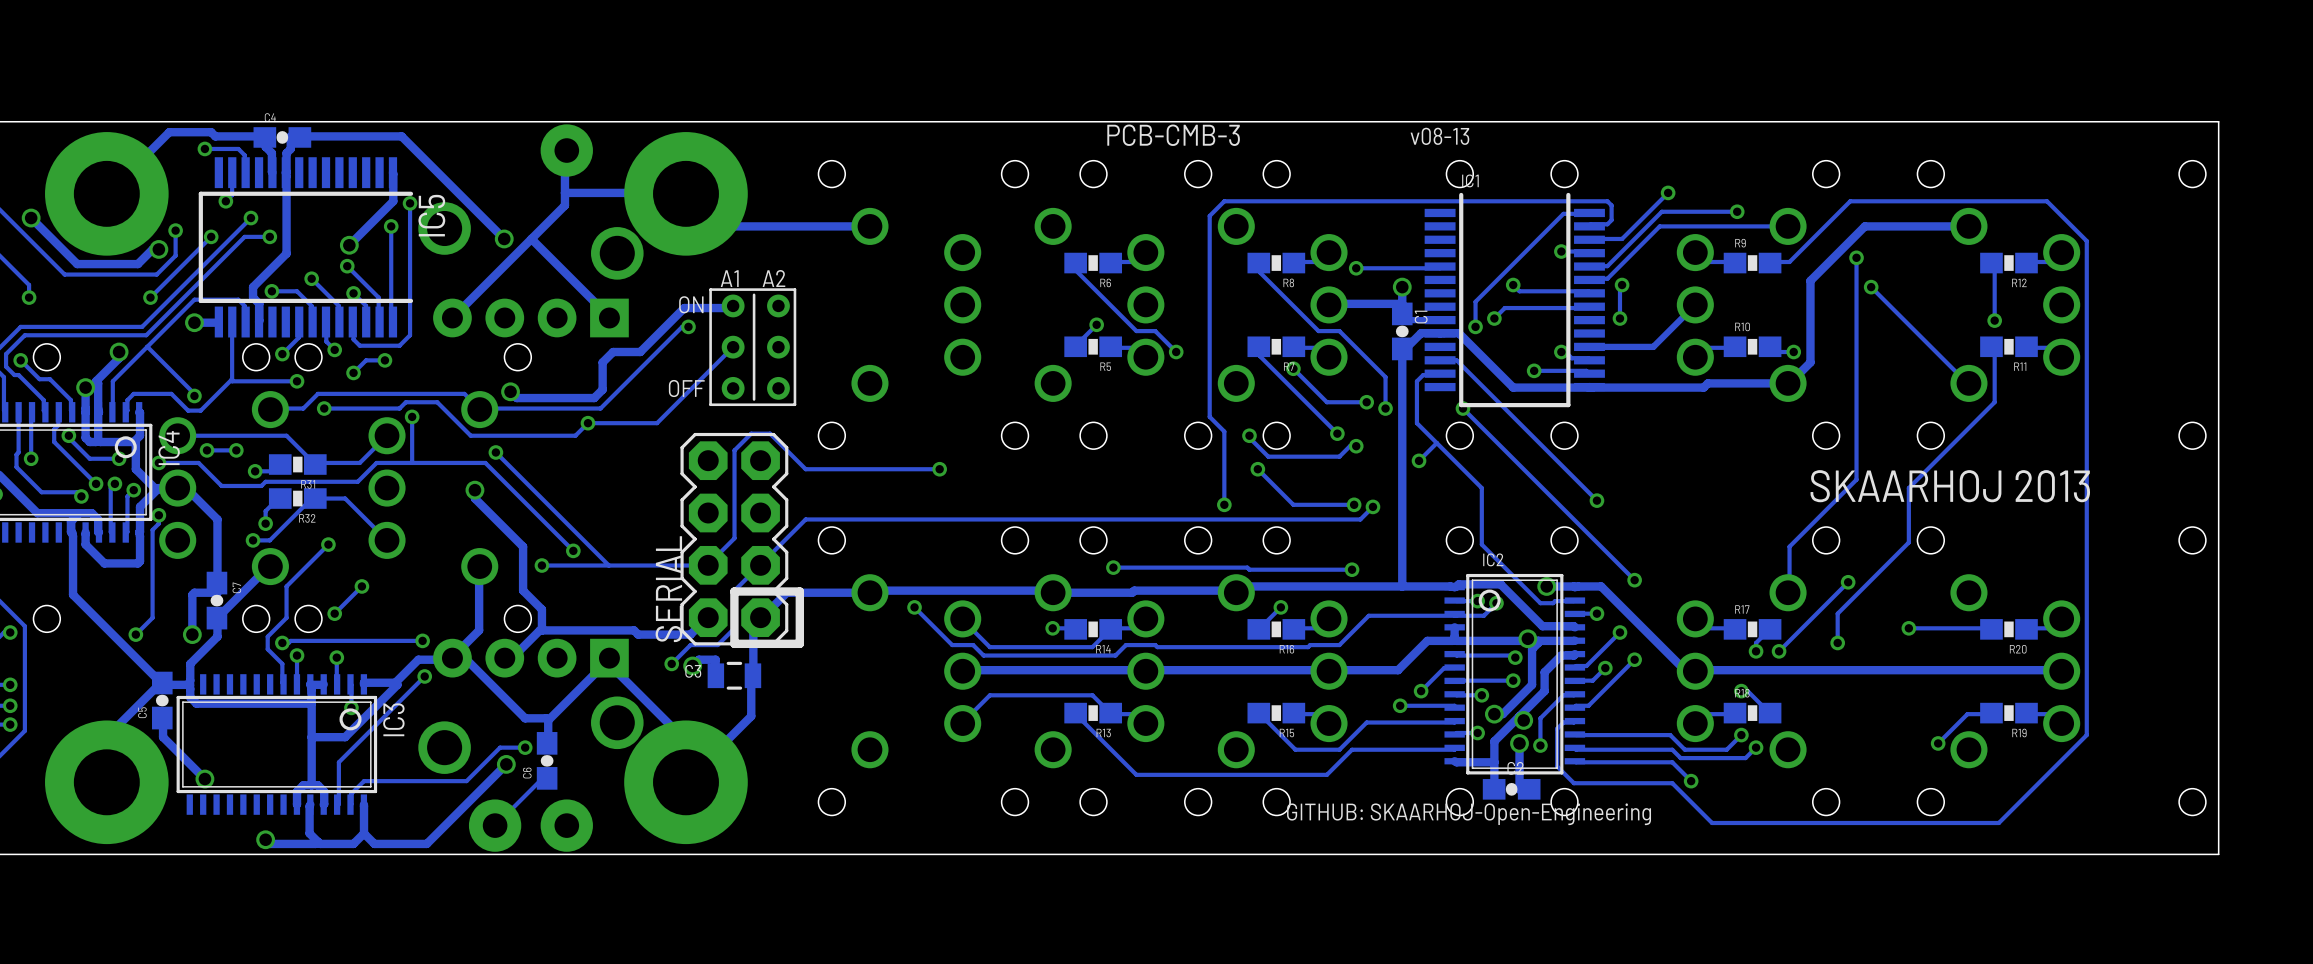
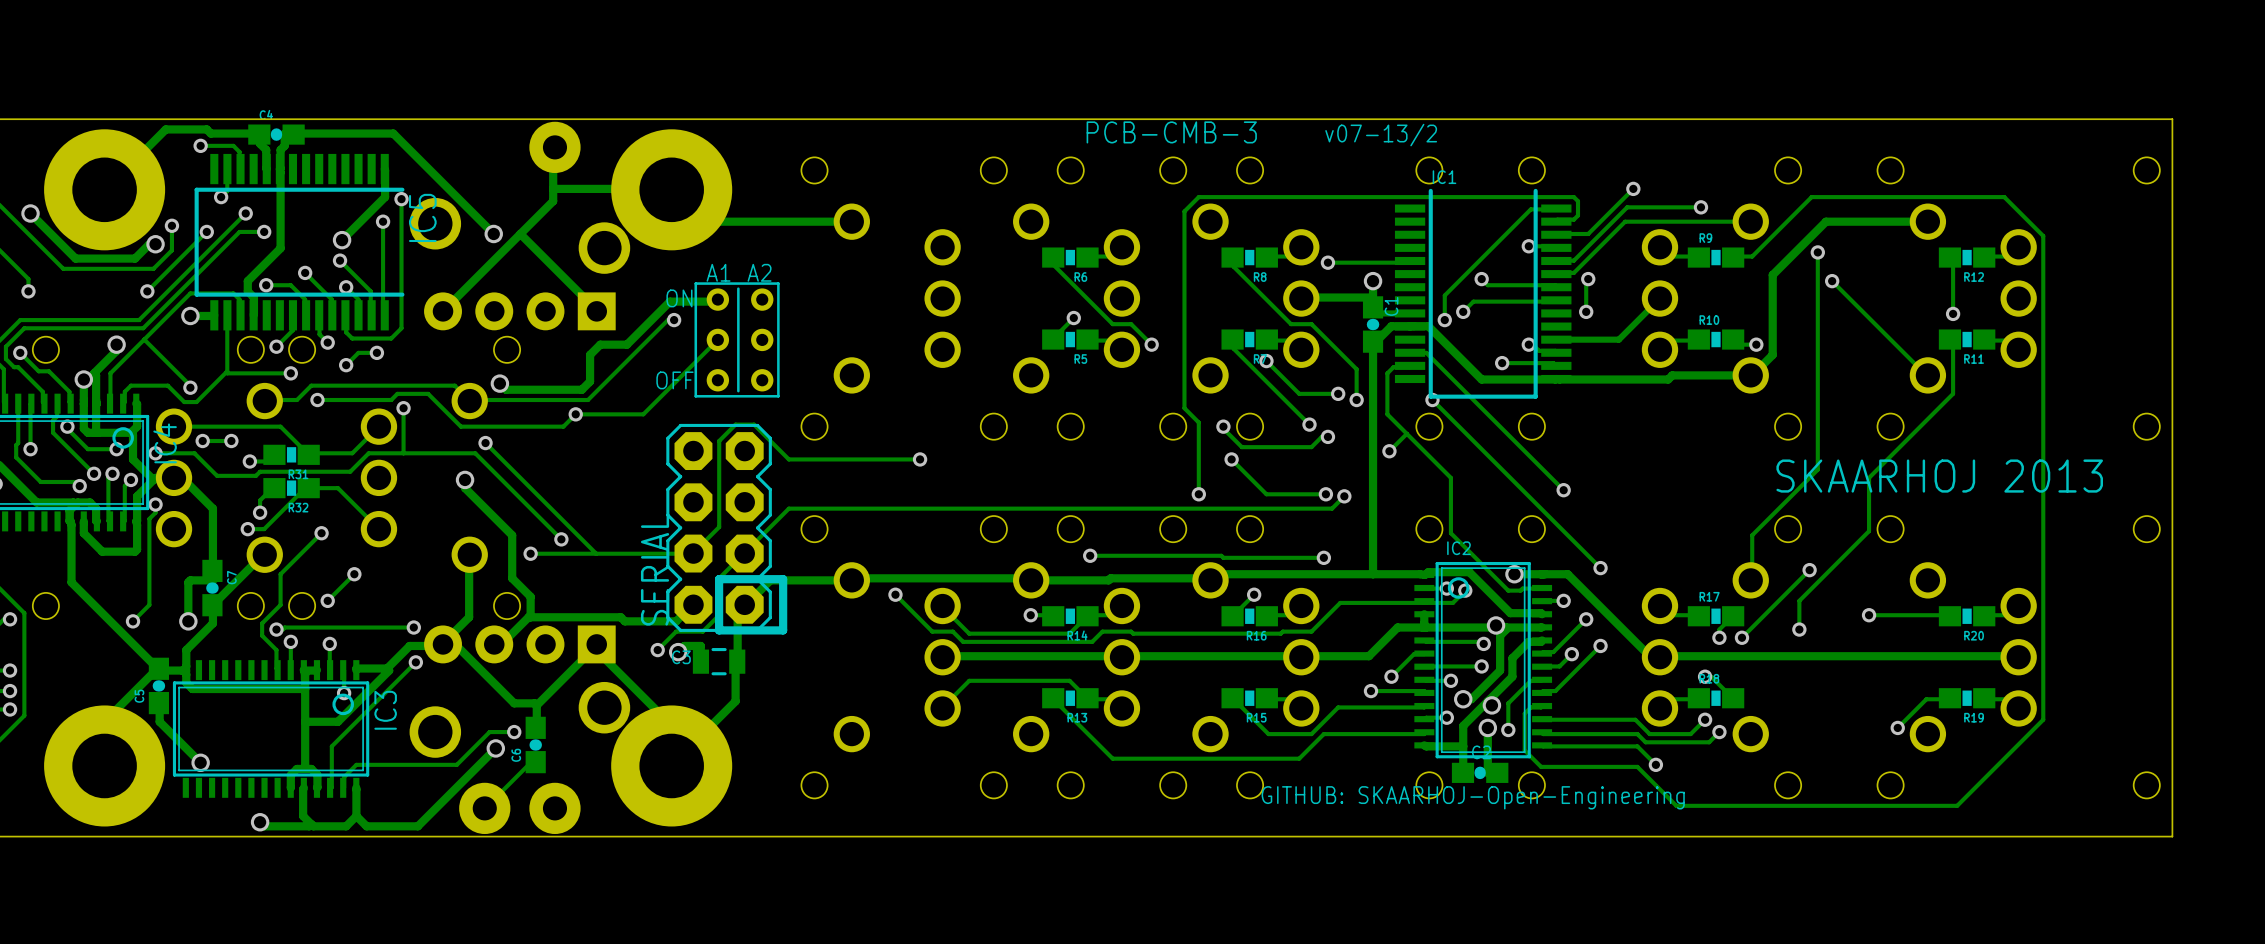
text: v08-13 (1439, 136) -> v07-13/2 (1381, 135)

